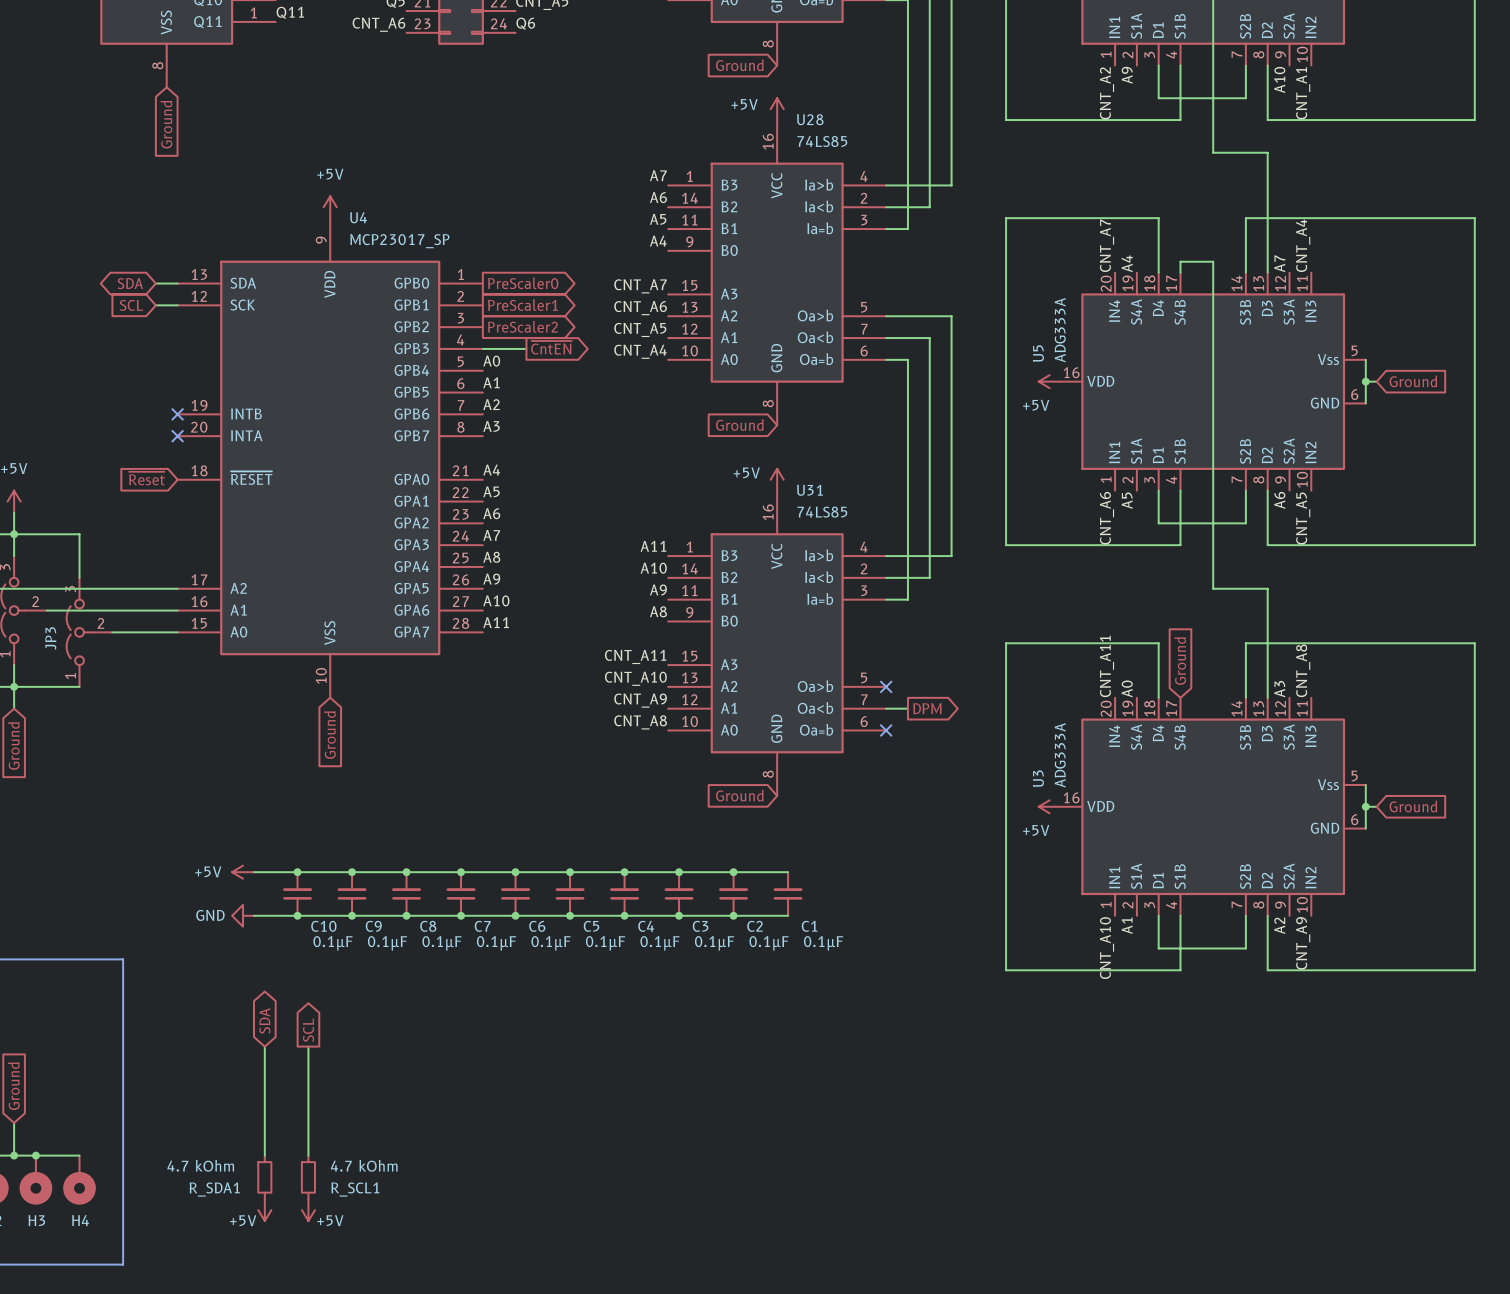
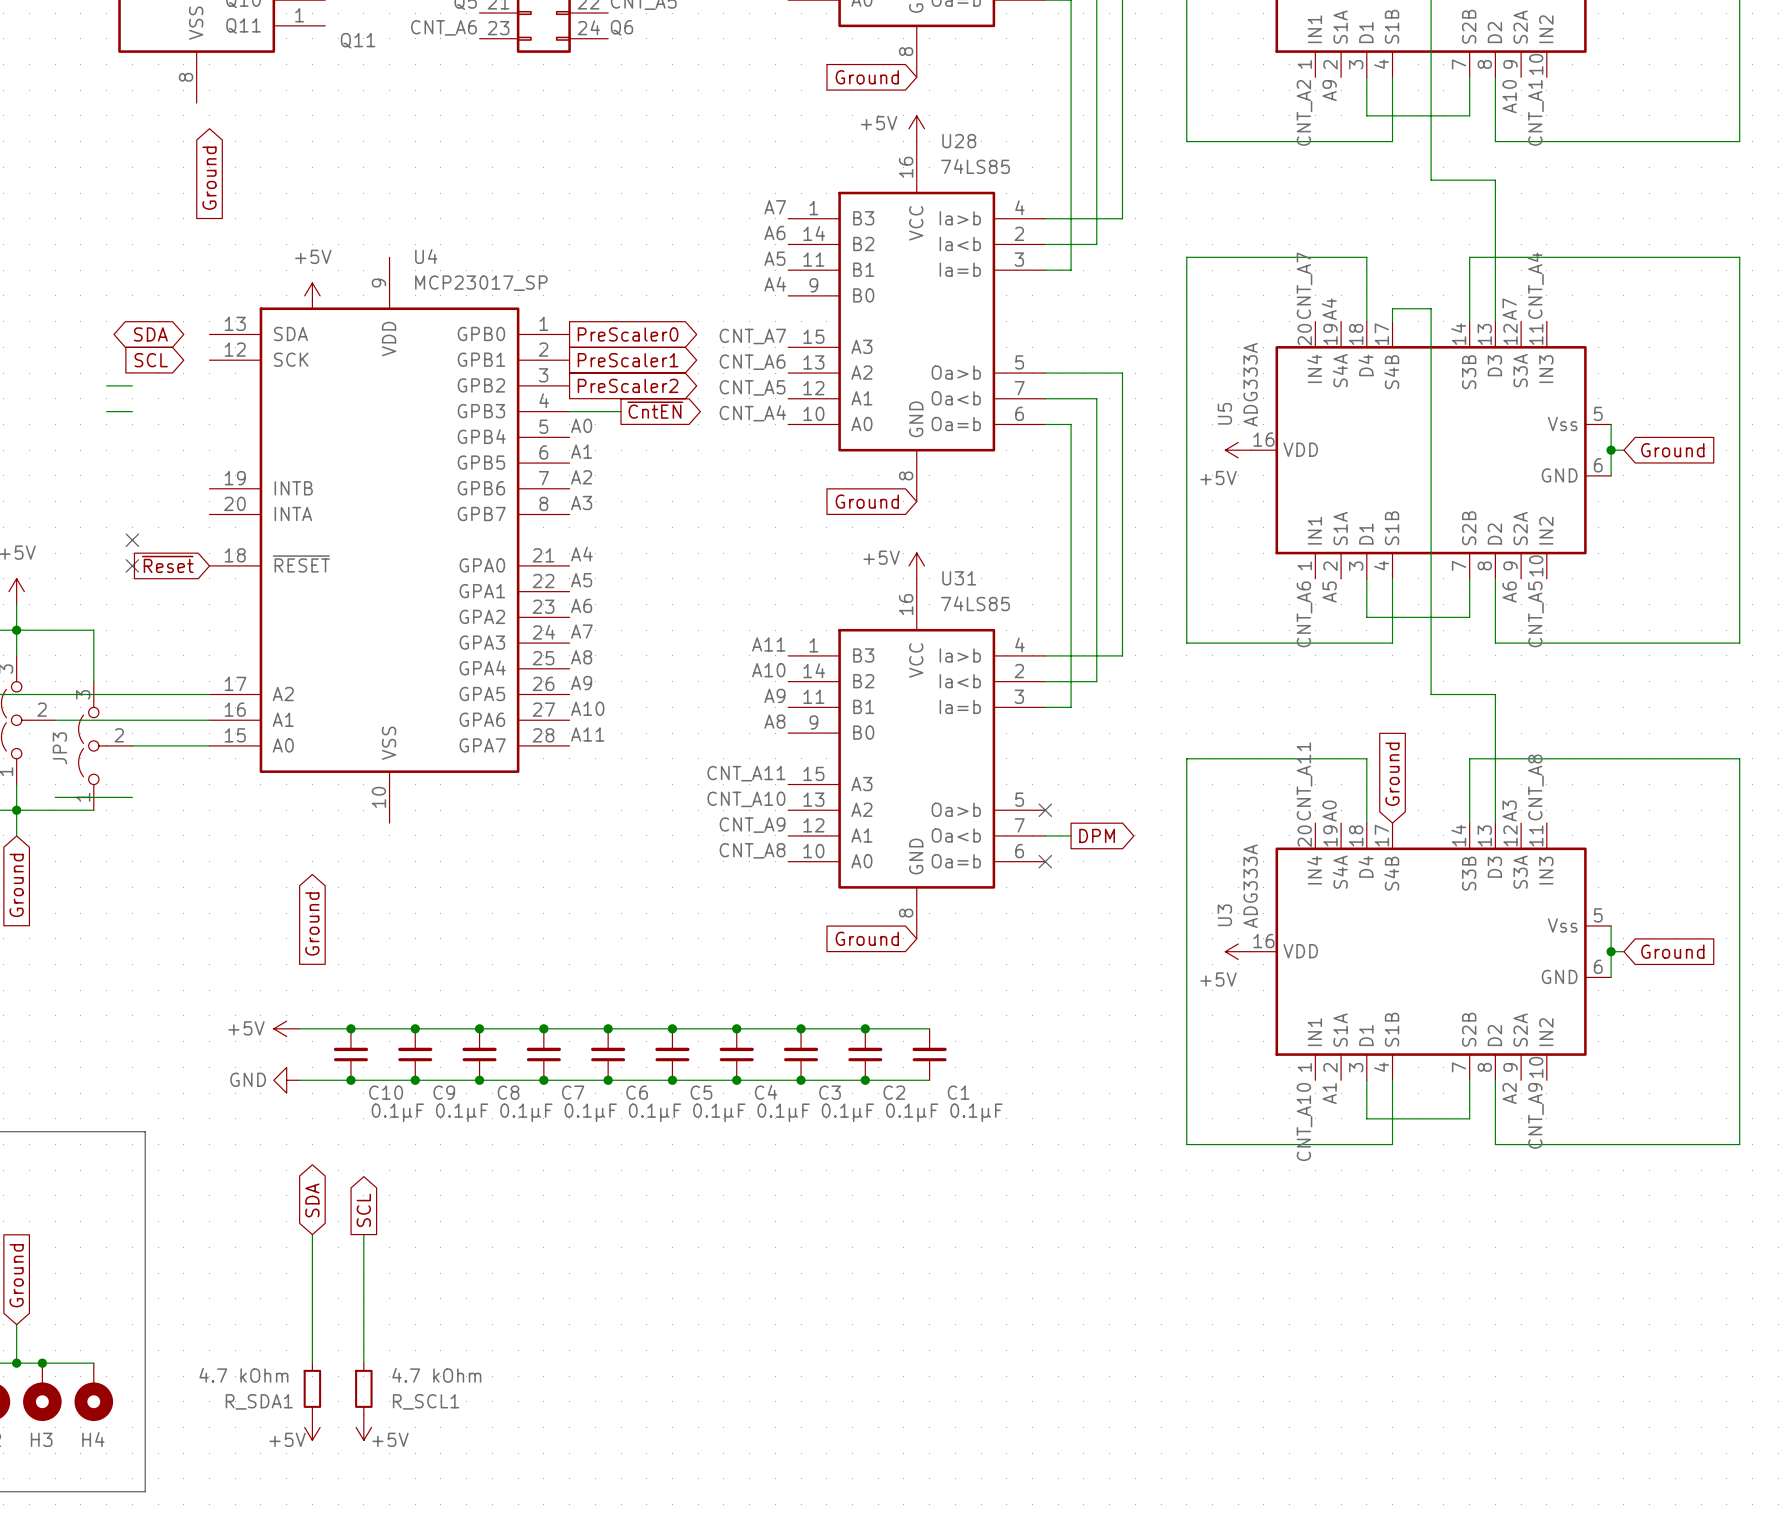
label position: Q11 (290, 12) -> Q11 (358, 40)
global label position: Ground (166, 124) -> Ground (209, 178)
power symbol position: +5V (330, 207) -> +5V (312, 295)
wire: (155, 283) (177, 283) -> (106, 385) (132, 385)
wire: (155, 305) (177, 305) -> (106, 411) (132, 411)
no-connect mark: (177, 414) -> none
no-connect mark: (177, 436) -> none
no-connect mark: none -> (132, 540)
no-connect mark: none -> (132, 565)
wire: none -> (55, 797) (132, 797)
global label position: Ground (329, 735) -> Ground (312, 923)

